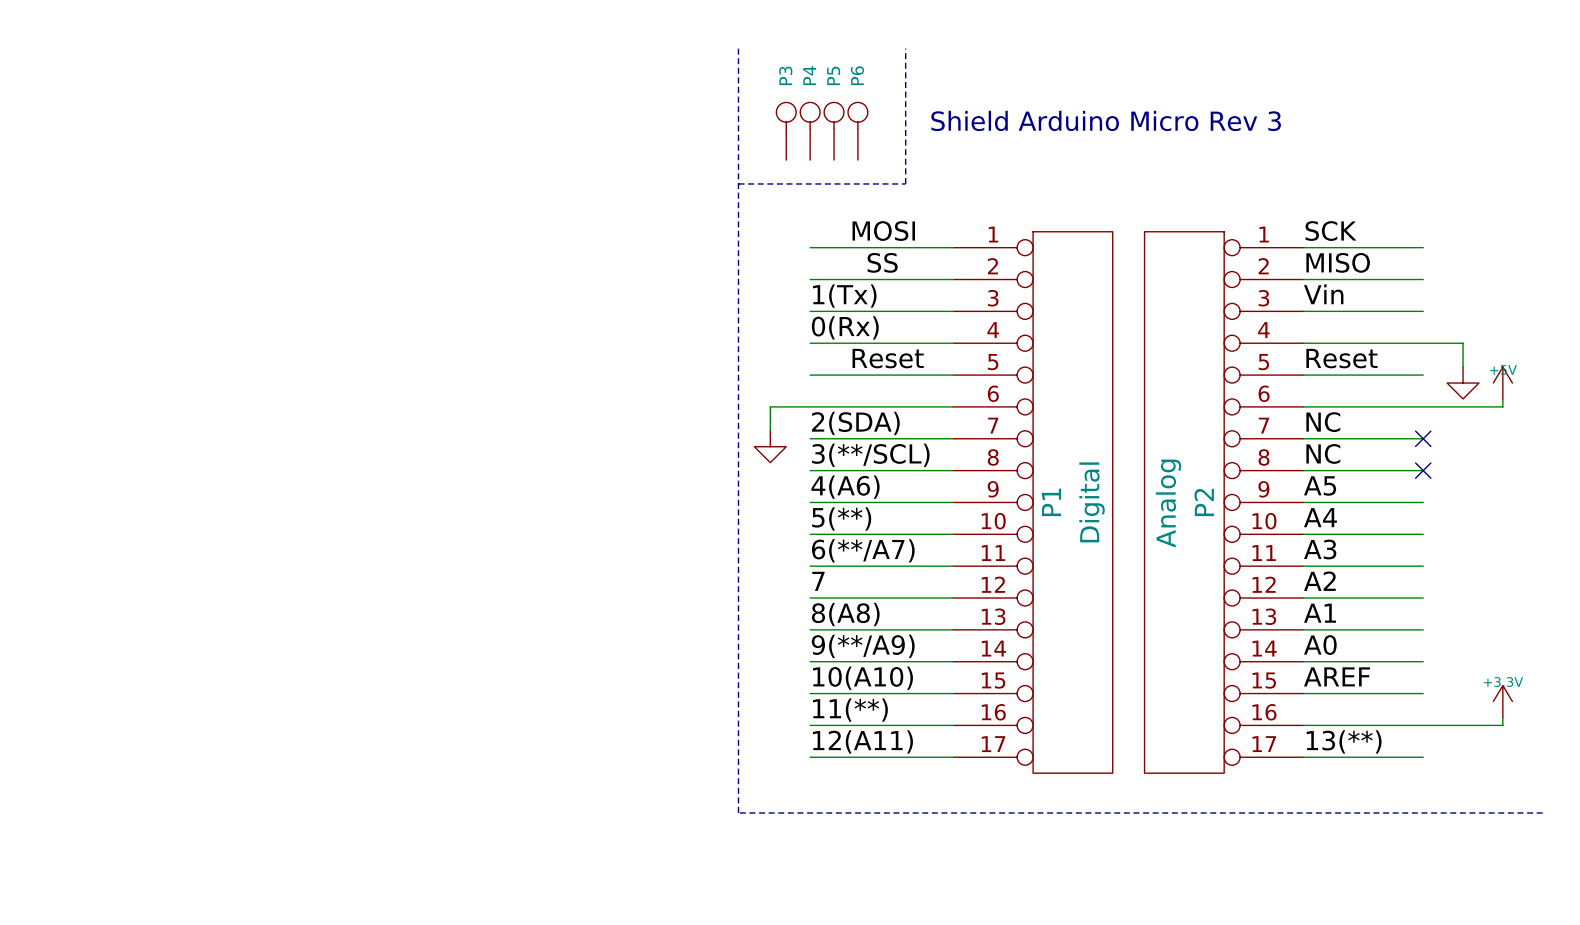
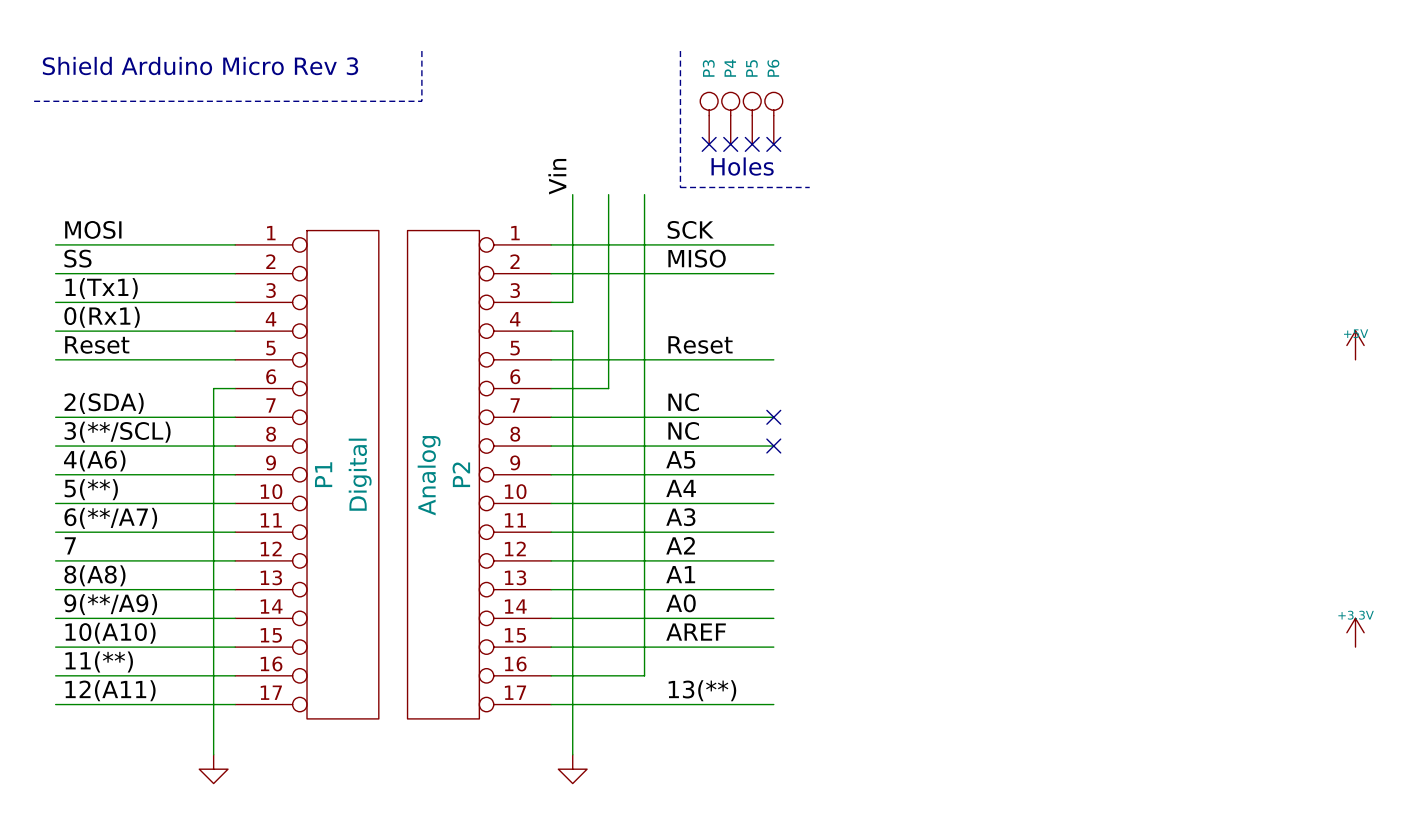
line: (738, 48) (738, 812) (1542, 812) -> none
line: (905, 48) (905, 183) (738, 183) -> none
line: none -> (421, 51) (421, 101) (34, 101)
line: none -> (680, 51) (680, 187) (809, 187)
text: none -> Shield Arduino Micro Rev 3 (200, 66)
text: Shield Arduino Micro Rev 3 (1106, 120) -> none
no-connect mark: none -> (709, 144)
no-connect mark: none -> (730, 144)
no-connect mark: none -> (752, 144)
no-connect mark: none -> (773, 144)
text: none -> Holes (742, 166)
label: none -> Vin (557, 176)
wire: none -> (572, 194) (572, 302) (551, 302)
wire: none -> (608, 194) (608, 388) (551, 388)
wire: none -> (644, 194) (644, 675) (551, 675)
label: MOSI (883, 231) -> none
label: SCK (1331, 231) -> none
wire: (810, 247) (953, 247) -> none
wire: (1303, 247) (1423, 247) -> none
label: none -> MOSI (93, 229)
label: none -> SCK (690, 229)
label: SS (882, 262) -> none
label: MISO (1338, 262) -> none
wire: none -> (55, 244) (235, 244)
wire: none -> (551, 244) (773, 244)
wire: (810, 279) (953, 279) -> none
wire: (1303, 279) (1423, 279) -> none
label: none -> SS (77, 258)
label: none -> MISO (697, 258)
label: Vin (1323, 294) -> none
label: 1(Tx) (844, 296) -> none
wire: none -> (55, 273) (235, 273)
wire: none -> (551, 273) (773, 273)
wire: (810, 311) (953, 311) -> none
wire: (1303, 311) (1423, 311) -> none
label: none -> 1(Tx1) (101, 288)
label: 0(Rx) (845, 327) -> none
wire: none -> (55, 302) (235, 302)
wire: (810, 343) (953, 343) -> none
wire: (1303, 343) (1463, 343) (1463, 367) -> none
label: none -> 0(Rx1) (102, 317)
label position: Reset (888, 358) -> Reset (700, 344)
label: Reset (1341, 358) -> none
wire: none -> (55, 331) (235, 331)
wire: none -> (551, 331) (572, 331) (572, 754)
wire: (810, 375) (953, 375) -> none
wire: (1303, 375) (1423, 375) -> none
label: none -> Reset (97, 344)
power symbol: (1463, 383) -> none
wire: none -> (55, 359) (235, 359)
wire: none -> (551, 359) (773, 359)
wire: (1502, 398) (1502, 406) (1303, 406) -> none
wire: (953, 406) (770, 406) (770, 430) -> none
label: NC (1323, 422) -> none
label: 2(SDA) (855, 423) -> none
wire: none -> (235, 388) (213, 388) (213, 754)
wire: (810, 438) (953, 438) -> none
wire: (1303, 438) (1423, 438) -> none
no-connect mark: (1423, 438) -> none
label: none -> NC (683, 402)
power symbol: (770, 446) -> none
label: none -> 2(SDA) (104, 403)
label: NC (1323, 453) -> none
label: 3(**/SCL) (870, 455) -> none
wire: none -> (55, 417) (235, 417)
wire: none -> (551, 417) (773, 417)
no-connect mark: none -> (773, 417)
wire: (810, 470) (953, 470) -> none
wire: (1303, 470) (1423, 470) -> none
no-connect mark: (1423, 470) -> none
label: none -> NC (683, 430)
label: none -> 3(**/SCL) (117, 432)
label: A5 (1320, 485) -> none
label: 4(A6) (845, 487) -> none
wire: none -> (55, 446) (235, 446)
wire: none -> (551, 446) (773, 446)
no-connect mark: none -> (773, 446)
wire: (810, 502) (953, 502) -> none
P1 position: (1033, 502) -> (307, 474)
P2 position: (1224, 502) -> (479, 474)
wire: (1303, 502) (1423, 502) -> none
label: none -> A5 (680, 459)
label: none -> 4(A6) (94, 460)
label: A4 (1320, 517) -> none
label: 5(**) (841, 518) -> none
wire: none -> (55, 474) (235, 474)
wire: none -> (551, 474) (773, 474)
wire: (810, 534) (953, 534) -> none
wire: (1303, 534) (1423, 534) -> none
label: none -> A4 (681, 488)
label: none -> 5(**) (91, 489)
label: A3 (1320, 549) -> none
label: 6(**/A7) (863, 550) -> none
wire: none -> (55, 503) (235, 503)
wire: none -> (551, 503) (773, 503)
wire: (810, 566) (953, 566) -> none
wire: (1303, 566) (1423, 566) -> none
label: none -> A3 (680, 517)
label: none -> 6(**/A7) (110, 518)
label: 7 (818, 581) -> none
label: A2 (1319, 581) -> none
wire: none -> (55, 532) (235, 532)
wire: none -> (551, 532) (773, 532)
wire: (810, 598) (953, 598) -> none
wire: (1303, 598) (1423, 598) -> none
label: none -> 7 (70, 545)
label: none -> A2 (680, 545)
label: A1 (1319, 613) -> none
label: 8(A8) (845, 614) -> none
wire: none -> (55, 560) (235, 560)
wire: none -> (551, 560) (773, 560)
wire: (810, 629) (953, 629) -> none
wire: (1303, 629) (1423, 629) -> none
label: none -> A1 (680, 574)
label: none -> 8(A8) (94, 575)
label: A0 (1320, 645) -> none
label: 9(**/A9) (863, 646) -> none
wire: none -> (55, 589) (235, 589)
wire: none -> (551, 589) (773, 589)
wire: (810, 661) (953, 661) -> none
wire: (1303, 661) (1423, 661) -> none
label: none -> A0 (680, 603)
label: none -> 9(**/A9) (110, 604)
label: AREF (1337, 676) -> none
label: 10(A10) (863, 678) -> none
wire: none -> (55, 618) (235, 618)
wire: none -> (551, 618) (773, 618)
wire: (810, 693) (953, 693) -> none
wire: (1303, 693) (1423, 693) -> none
label: none -> AREF (696, 632)
label: none -> 10(A10) (110, 633)
label: 11(**) (850, 710) -> none
wire: none -> (55, 647) (235, 647)
wire: none -> (551, 647) (773, 647)
wire: (1502, 717) (1502, 725) (1303, 725) -> none
wire: (810, 725) (953, 725) -> none
label: none -> 11(**) (99, 662)
label: 12(A11) (863, 741) -> none
label: 13(**) (1344, 741) -> none
wire: none -> (55, 675) (235, 675)
wire: (810, 757) (953, 757) -> none
wire: (1303, 757) (1423, 757) -> none
label: none -> 12(A11) (110, 690)
label: none -> 13(**) (702, 690)
wire: none -> (55, 704) (235, 704)
wire: none -> (551, 704) (773, 704)
power symbol: none -> (213, 769)
power symbol: none -> (572, 769)

